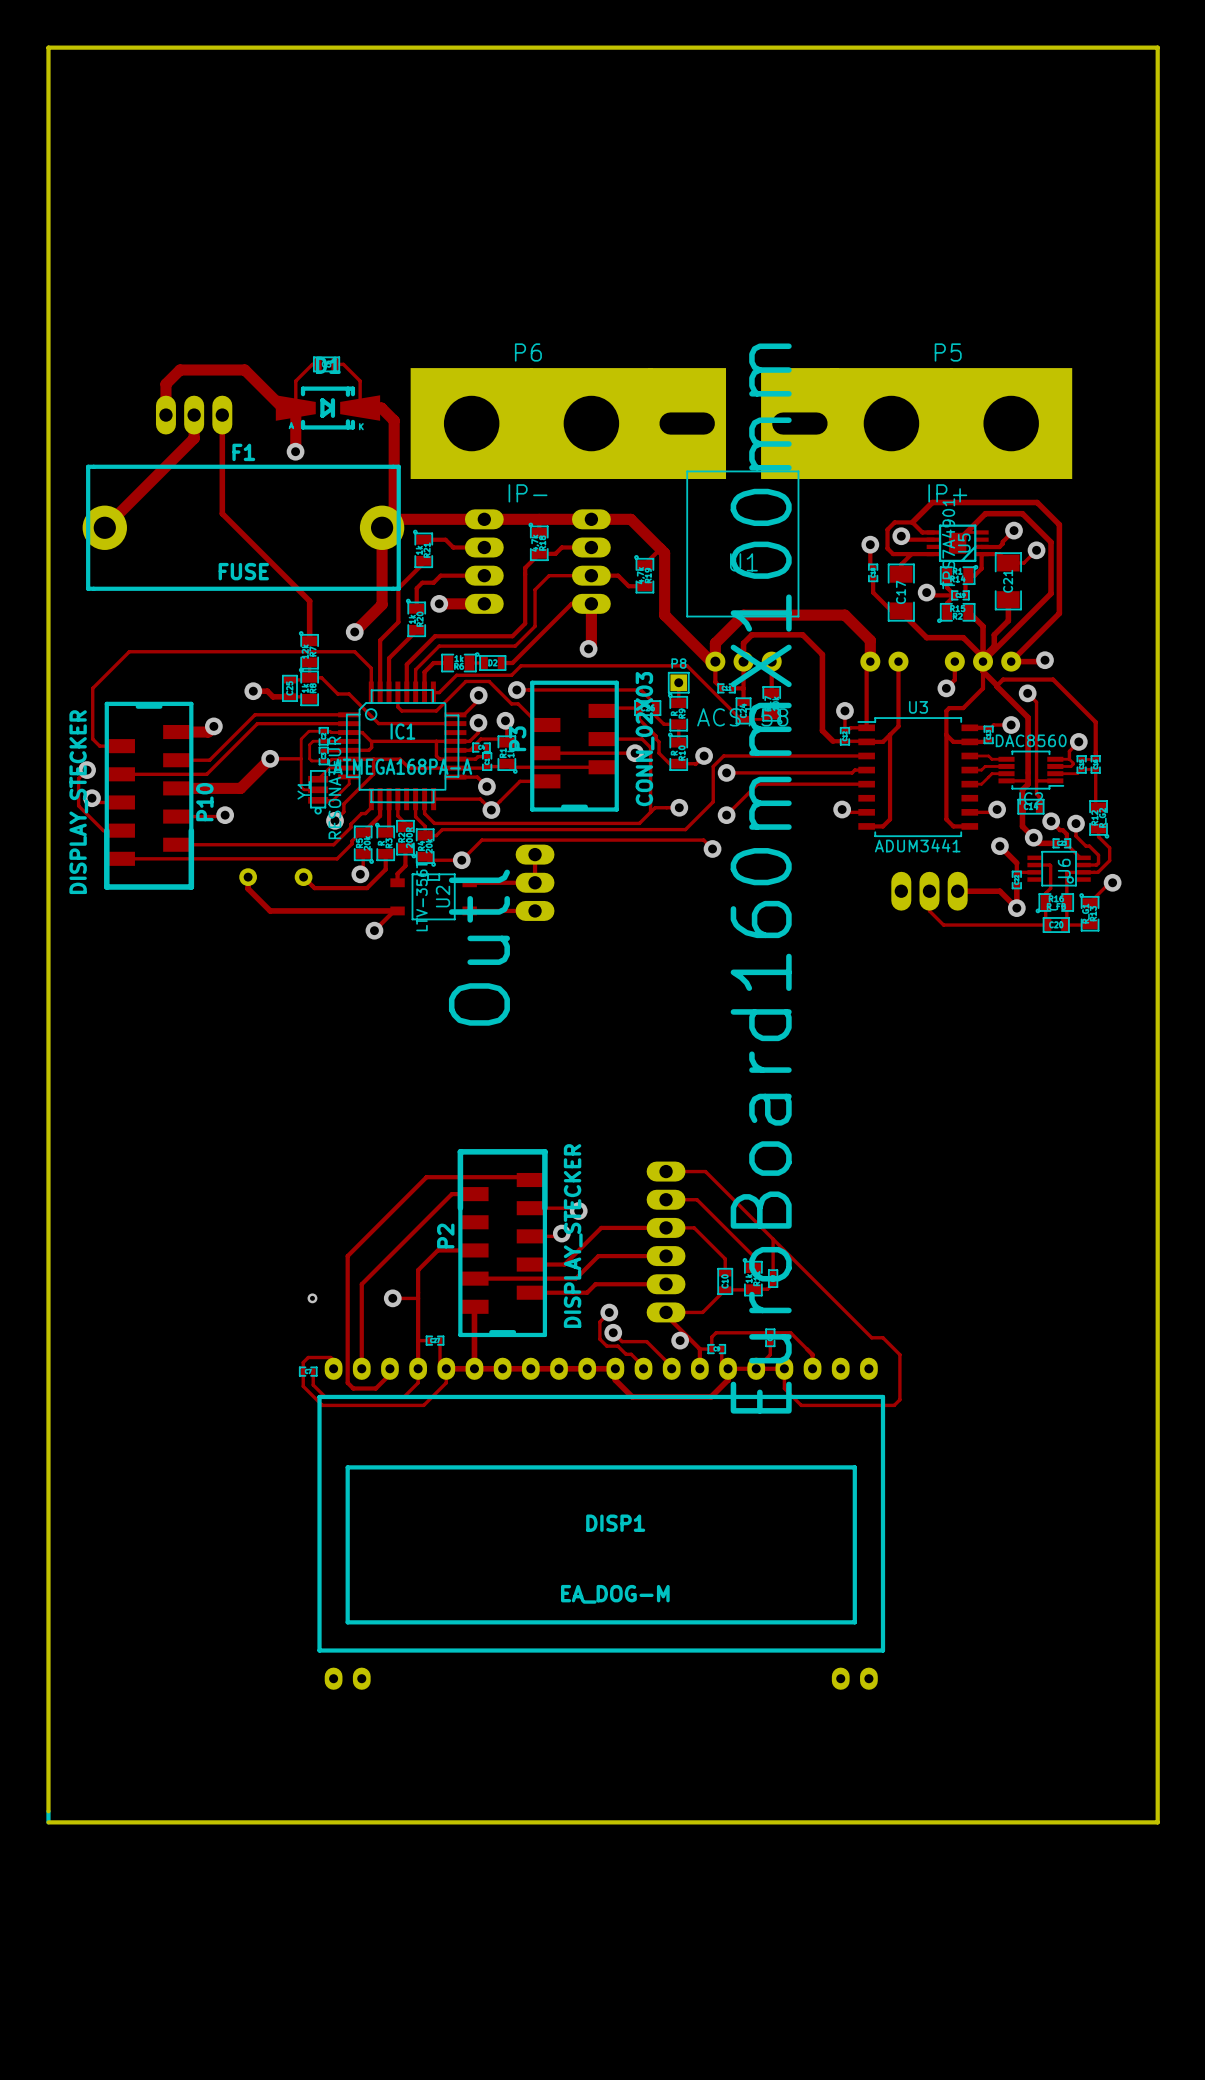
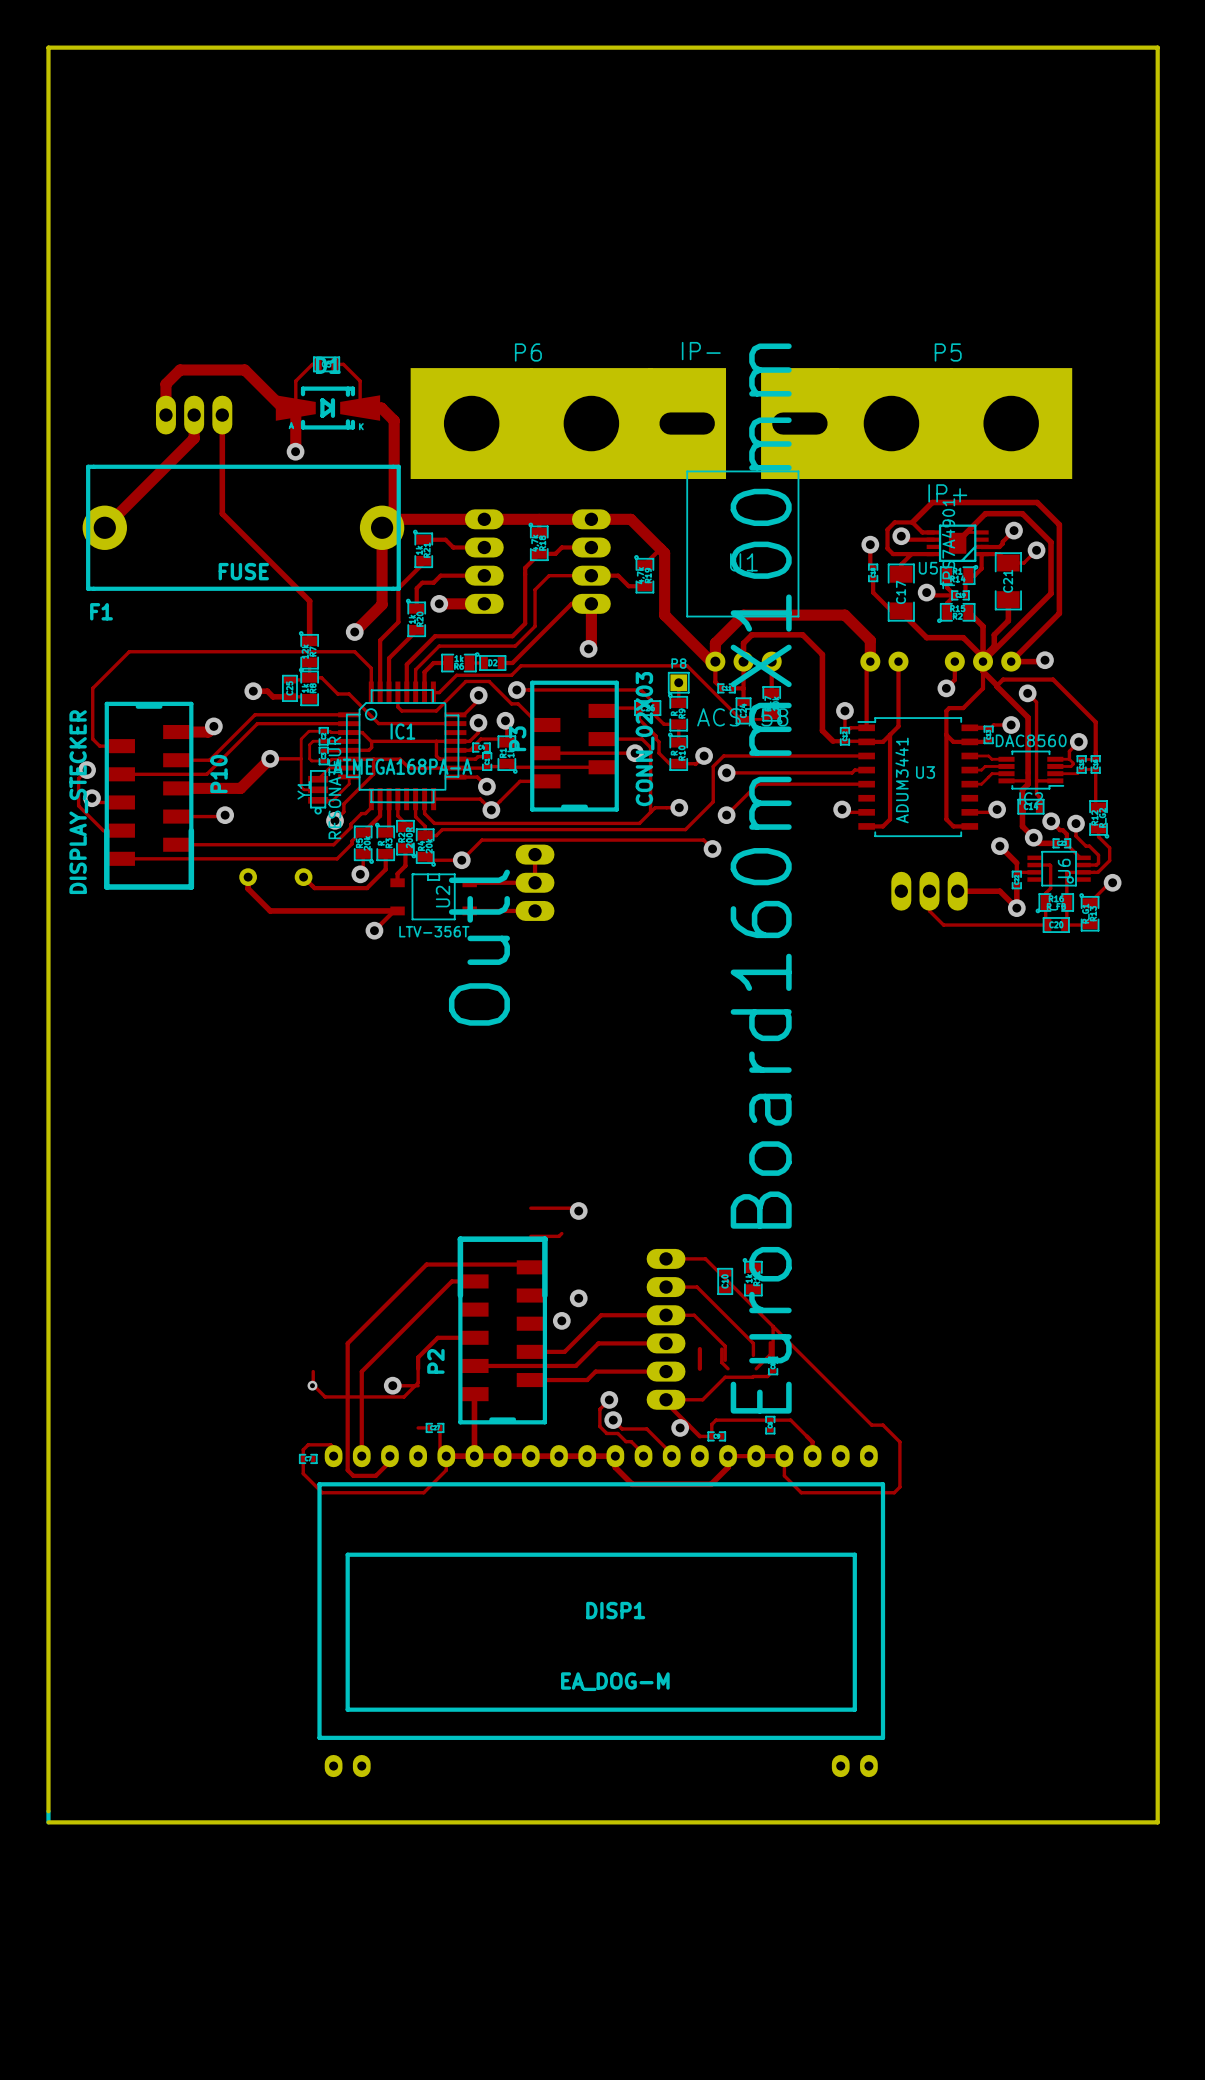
F1 name position: F1 (243, 452) -> F1 (101, 611)
P6 value position: IP- (528, 493) -> IP- (701, 351)
U5 name rotation: 0° (964, 543) -> 90° clockwise (928, 568)
U5 name position: U5 (964, 543) -> U5 (928, 568)
U3 name position: U3 (918, 707) -> U3 (925, 772)
P10 name position: P10 (204, 802) -> P10 (218, 773)
U3 value rotation: 0° (917, 845) -> 90° counterclockwise (902, 780)
U2 value rotation: 0° (421, 896) -> 90° clockwise (434, 931)
track: (666, 1171) (705, 1171) (871, 1337) (883, 1337) (899, 1354) (899, 1399) (894, 1405) (801, 1405) (784, 1388) (784, 1368) (728, 1368) (728, 1380) (711, 1396) (632, 1396) (615, 1380) (615, 1368) (446, 1368) -> (666, 1258) (705, 1258) (871, 1425) (883, 1425) (899, 1442) (899, 1487) (894, 1492) (801, 1492) (784, 1475) (784, 1456) (728, 1456) (728, 1467) (711, 1484) (632, 1484) (615, 1467) (615, 1456) (446, 1456)
track: (530, 1180) (528, 1177) (426, 1177) (347, 1256) (347, 1343) -> (530, 1267) (528, 1264) (426, 1264) (347, 1343)
track: (474, 1194) (451, 1194) (361, 1284) (361, 1368) -> (474, 1281) (451, 1281) (361, 1371) (361, 1456)
track: (666, 1199) (697, 1199) (753, 1256) (753, 1268) -> (666, 1287) (697, 1287) (753, 1343) (753, 1355)
via: (561, 1233) -> none
P2 name position: P2 (445, 1236) -> P2 (435, 1361)
P2 value: DISPLAY_STECKER (573, 1236) -> none
track: (773, 1239) (773, 1273) -> (773, 1326) (773, 1360)
part position: (666, 1241) -> (666, 1329)
P2 position: (502, 1243) -> (502, 1330)
track: (474, 1250) (437, 1250) (418, 1270) (418, 1357) -> (474, 1337) (437, 1337) (418, 1357)
track: (666, 1256) (598, 1256) (575, 1278) (474, 1278) -> (666, 1343) (598, 1343) (575, 1365) (474, 1365)
track: (530, 1264) (564, 1264) (601, 1227) (694, 1227) (725, 1258) (725, 1272) -> (530, 1351) (564, 1351) (601, 1315) (694, 1315) (725, 1346) (725, 1360)
part position: (773, 1278) -> (773, 1365)
track: (773, 1283) (767, 1289) (725, 1289) (702, 1312) (666, 1312) (666, 1315) (699, 1349) (711, 1349) (711, 1337) (716, 1332) (790, 1332) (812, 1354) (812, 1368) -> (773, 1370) (767, 1376) (725, 1377) (702, 1399) (666, 1399) (666, 1402) (699, 1436) (711, 1436) (711, 1424) (716, 1420) (790, 1420) (812, 1442) (812, 1456)
track: (666, 1284) (595, 1284) (587, 1292) (530, 1292) -> (666, 1371) (595, 1371) (587, 1380) (530, 1380)
via: (312, 1298) -> none
track: (392, 1298) (418, 1298) -> (392, 1385) (418, 1385)
via: (392, 1298) -> none
via: none -> (578, 1298)
track: (474, 1306) (474, 1368) -> (474, 1394) (474, 1456)
track: (609, 1312) (599, 1322) (599, 1339) (606, 1346) (617, 1346) (626, 1354) (631, 1354) (643, 1368) -> (609, 1399) (599, 1409) (599, 1426) (606, 1433) (617, 1433) (626, 1441) (631, 1441) (643, 1456)
via: (609, 1312) -> none
via: none -> (561, 1320)
track: (613, 1332) (622, 1341) (646, 1341) (671, 1368) -> (613, 1420) (622, 1428) (646, 1428) (671, 1456)
via: (613, 1332) -> none
part position: (770, 1337) -> (770, 1425)
track: (418, 1340) (430, 1340) -> (418, 1427) (430, 1427)
part position: (435, 1340) -> (435, 1427)
track: (440, 1340) (440, 1362) (446, 1368) -> (440, 1427) (440, 1449) (446, 1456)
via: (680, 1340) -> none
part position: (716, 1349) -> (716, 1436)
track: (333, 1368) (333, 1360) (330, 1357) (308, 1357) (303, 1362) (303, 1386) (322, 1405) (423, 1405) (446, 1382) (446, 1368) -> (333, 1456) (333, 1447) (330, 1444) (308, 1444) (303, 1449) (303, 1473) (322, 1492) (423, 1492) (446, 1470) (446, 1456)
track: (389, 1368) (389, 1374) (375, 1388) (353, 1388) (347, 1382) -> (389, 1456) (389, 1461) (375, 1475) (353, 1475) (347, 1470) (347, 1382)
part position: (308, 1371) -> (308, 1458)
via: none -> (312, 1385)
via: none -> (392, 1385)
via: none -> (609, 1399)
via: none -> (613, 1420)
via: none -> (680, 1427)
DISP1 position: (601, 1523) -> (601, 1611)

